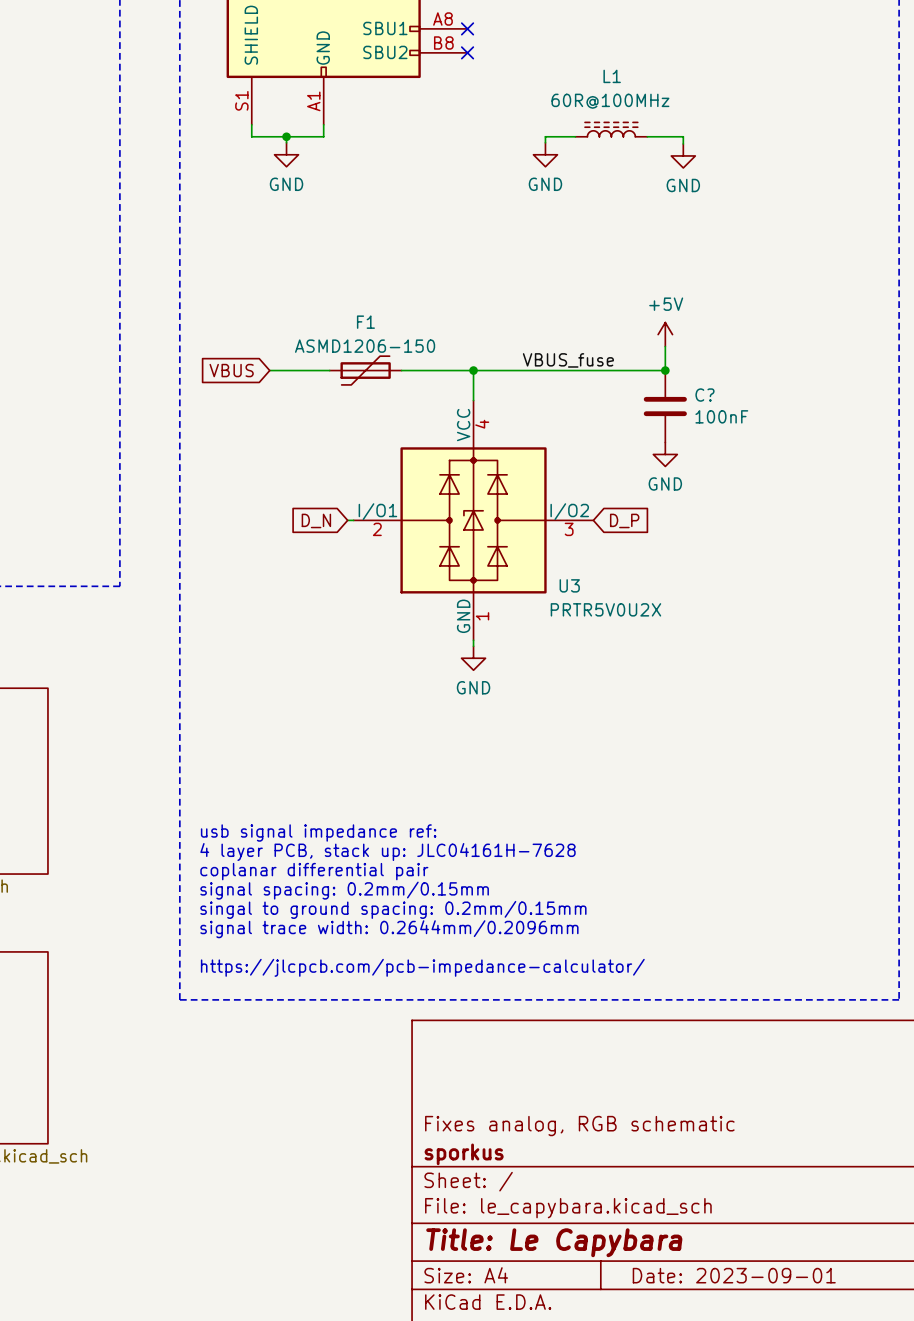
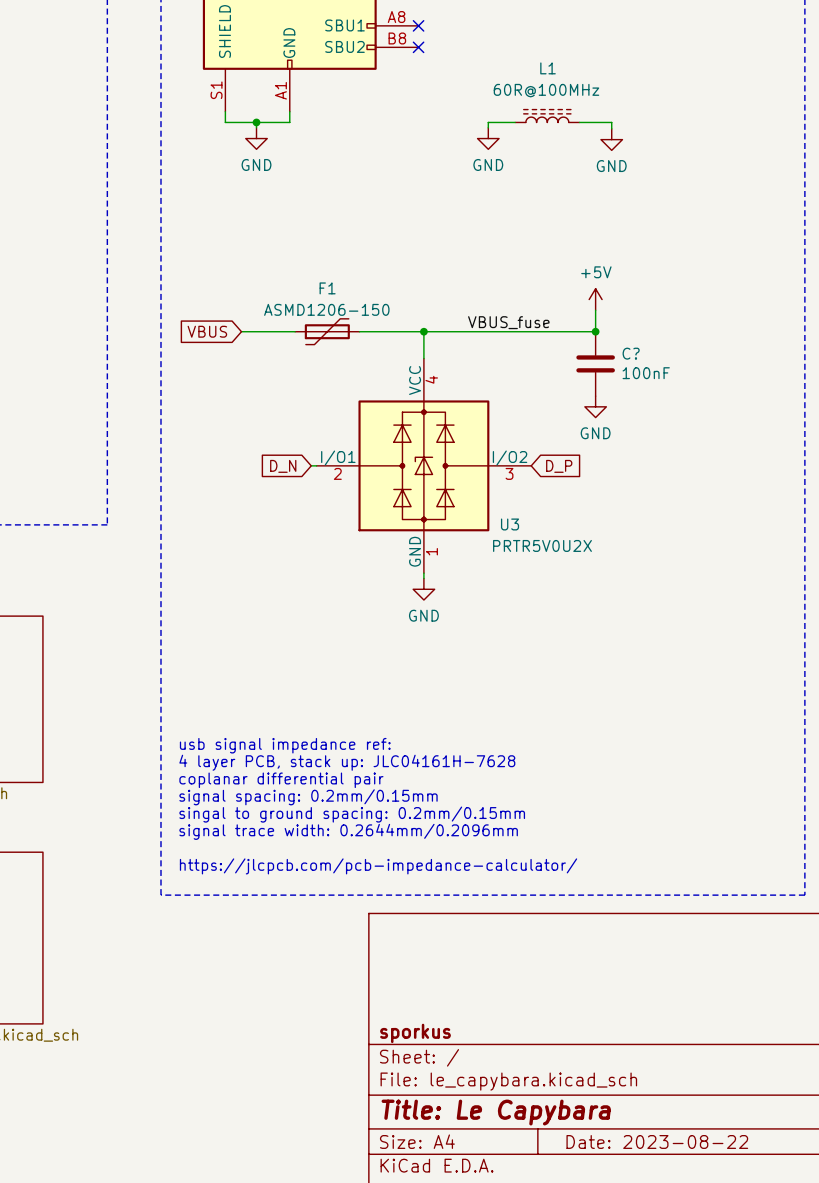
title block: Fixes analog, RGB schematic (579, 1126) -> none
title block: Date: 2023-09-01 (734, 1275) -> Date: 2023-08-22 (657, 1141)

